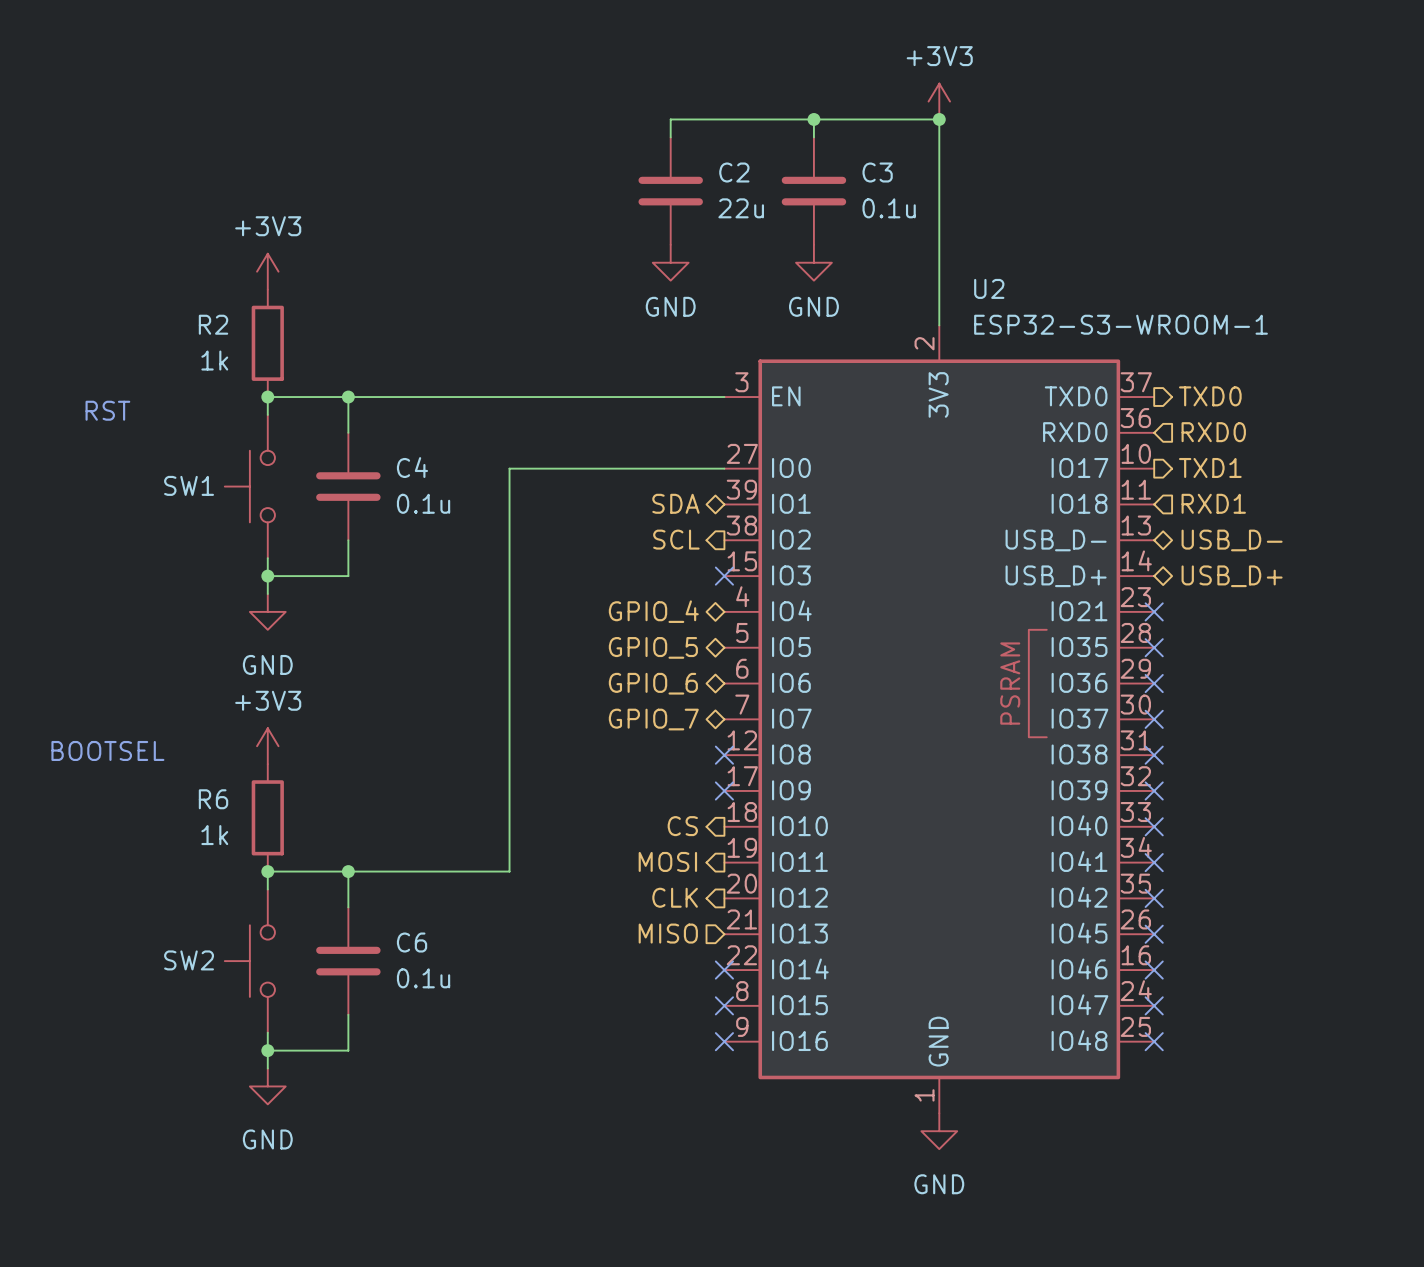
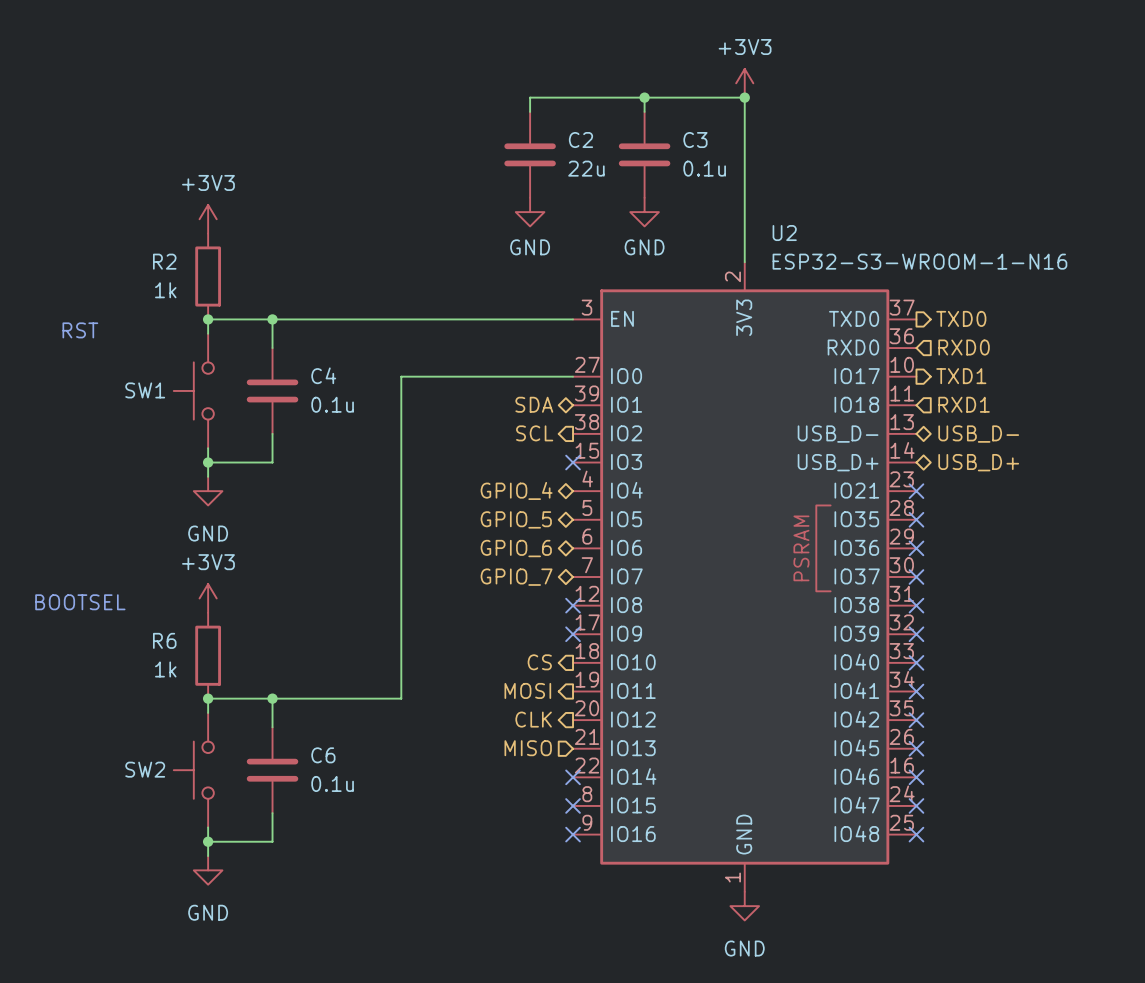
U2 value: ESP32-S3-WROOM-1 (1121, 324) -> ESP32-S3-WROOM-1-N16 (919, 261)

